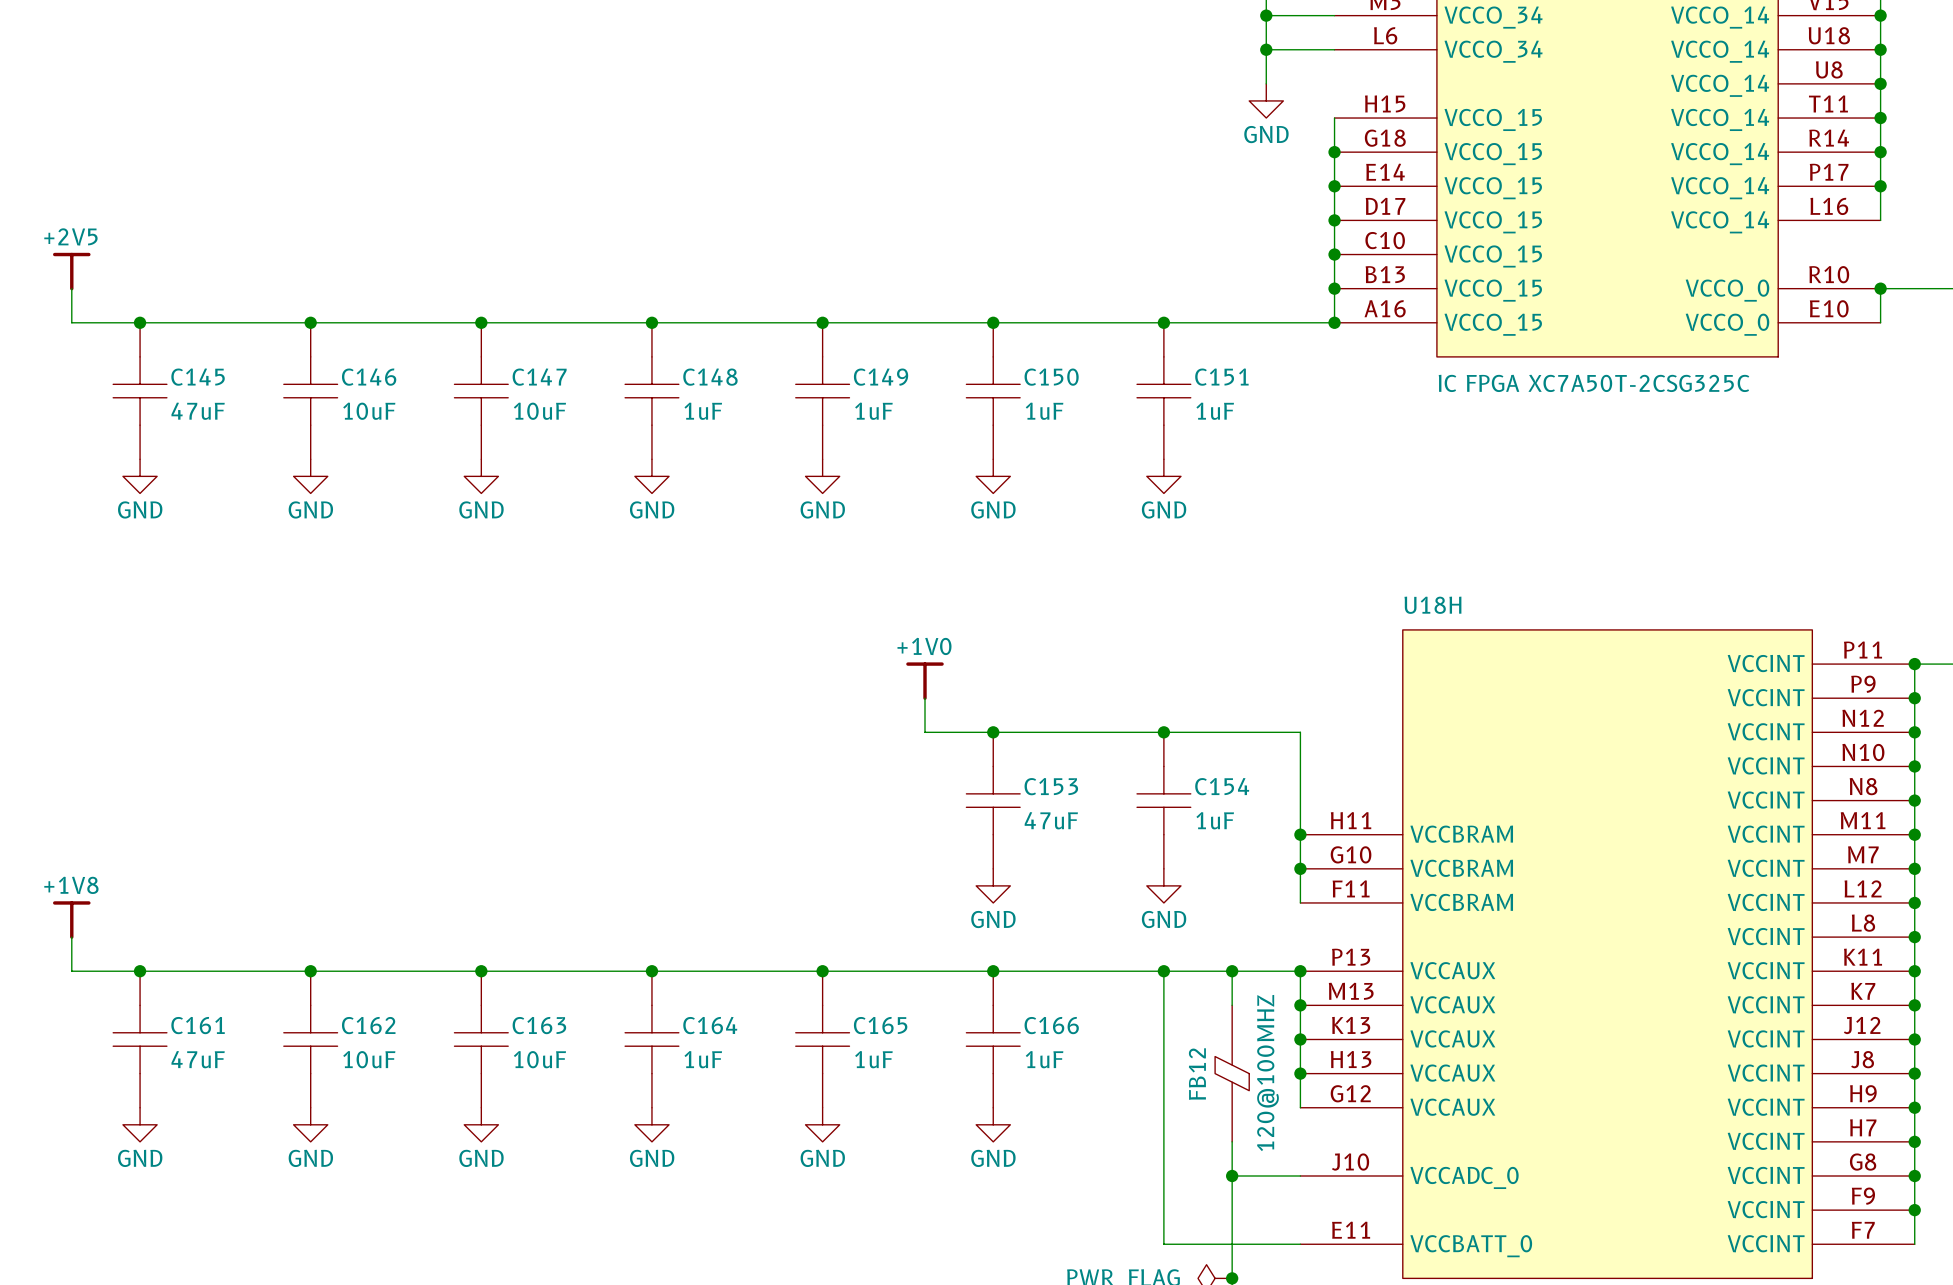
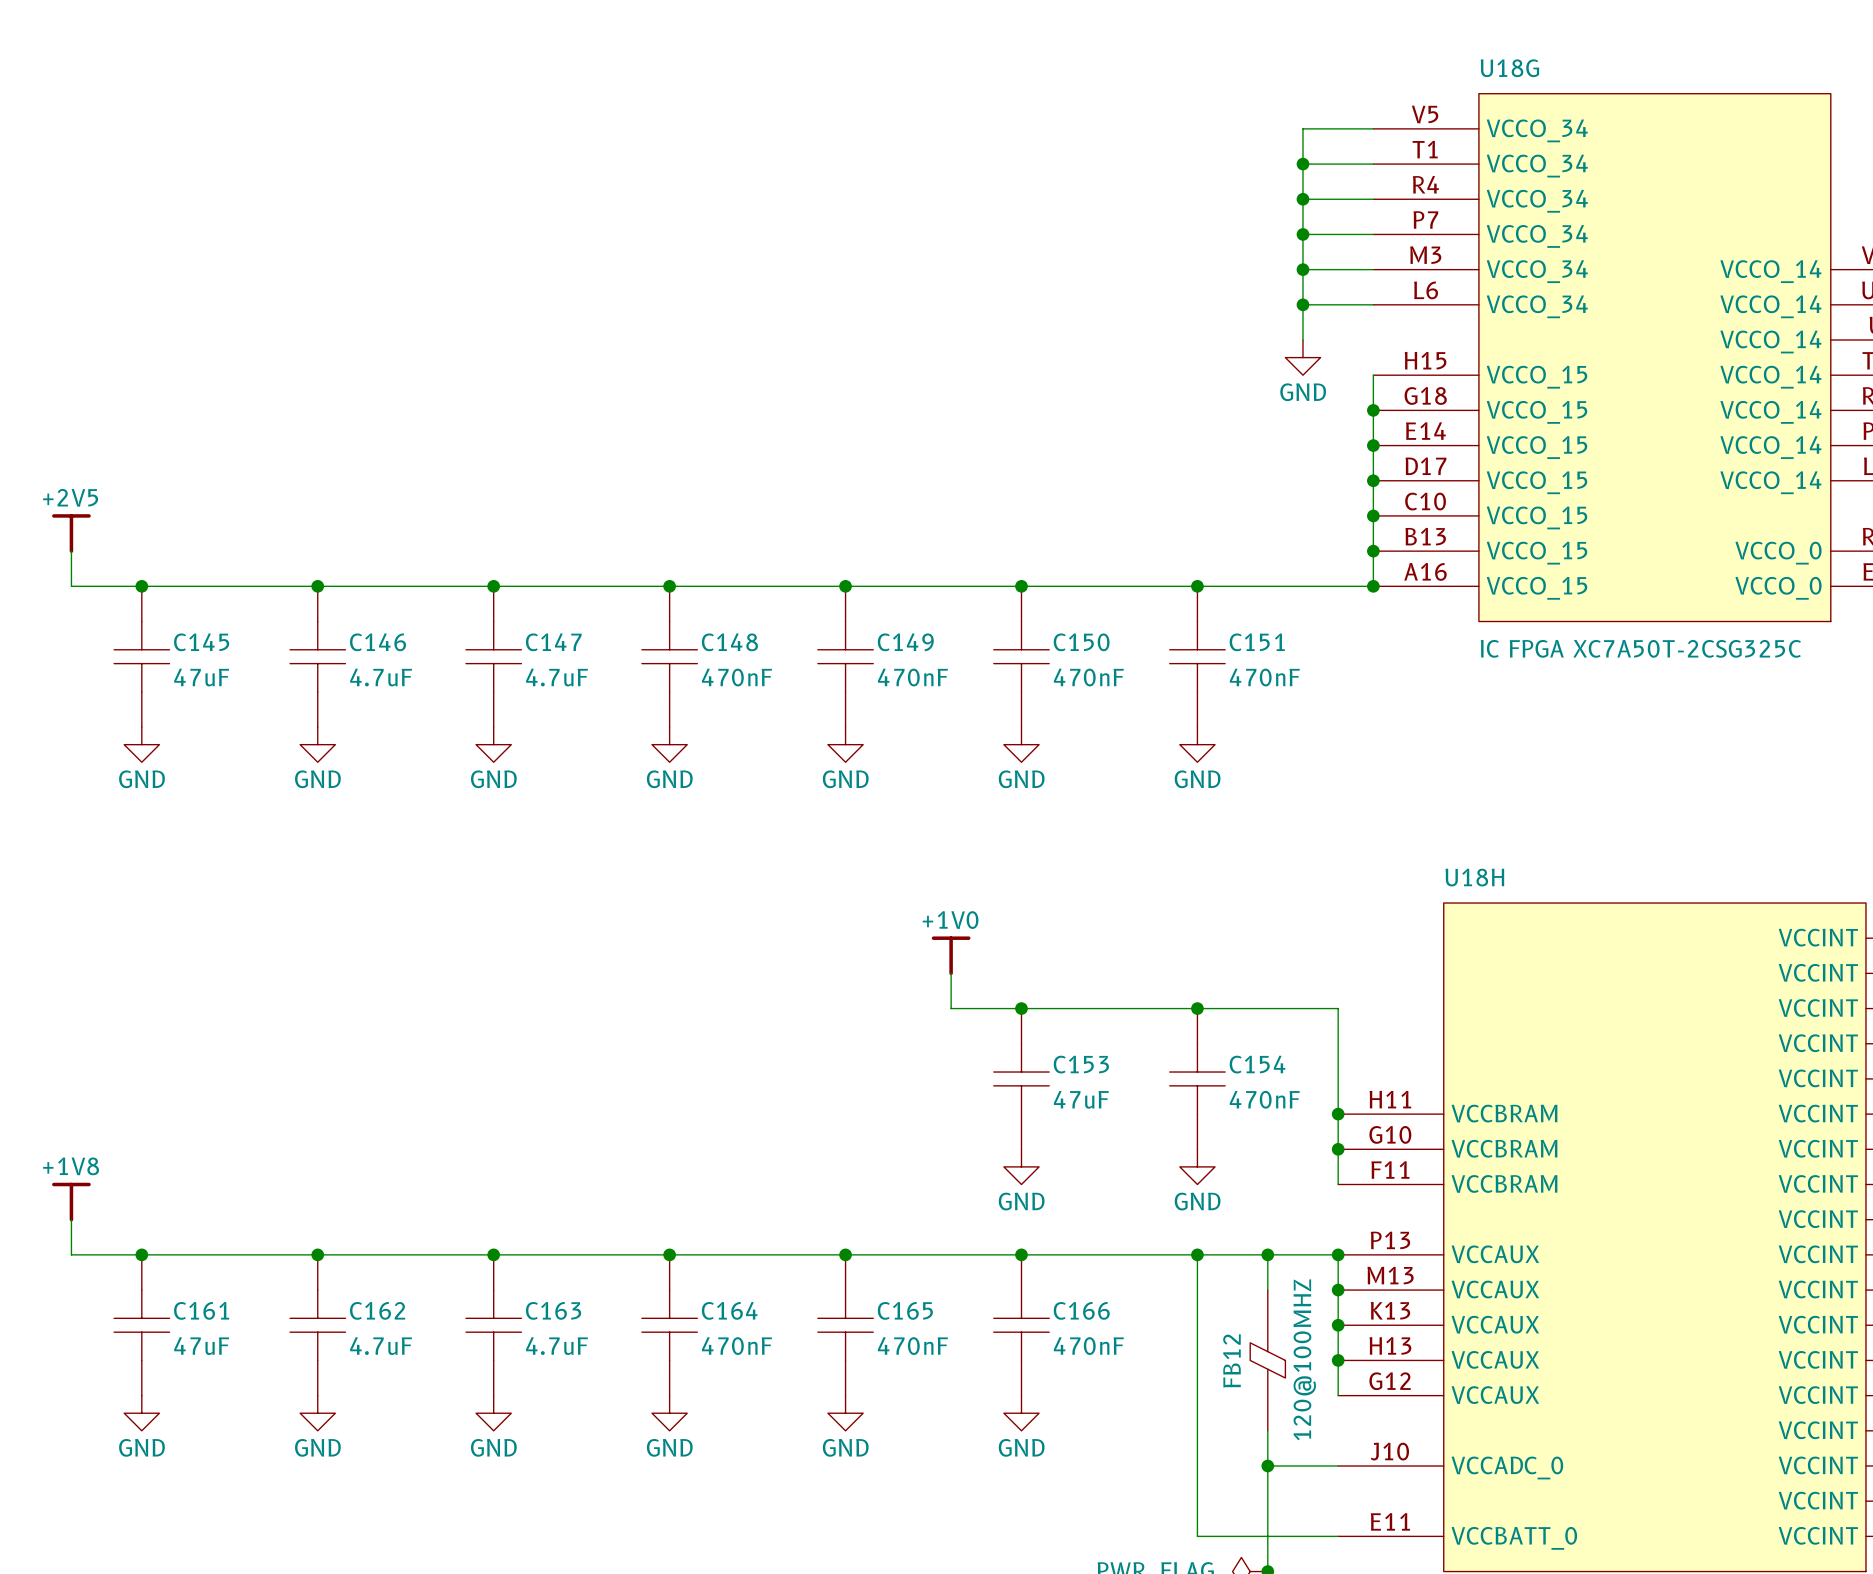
C146 value: 10uF (369, 411) -> 4.7uF (381, 677)
C147 value: 10uF (539, 411) -> 4.7uF (557, 677)
C148 value: 1uF (703, 411) -> 470nF (736, 677)
C149 value: 1uF (873, 411) -> 470nF (912, 677)
C150 value: 1uF (1044, 411) -> 470nF (1088, 677)
C151 value: 1uF (1215, 411) -> 470nF (1264, 677)
C154 value: 1uF (1215, 820) -> 470nF (1264, 1099)
C162 value: 10uF (369, 1059) -> 4.7uF (381, 1346)
C163 value: 10uF (539, 1059) -> 4.7uF (557, 1346)
C164 value: 1uF (703, 1059) -> 470nF (736, 1346)
C165 value: 1uF (873, 1059) -> 470nF (912, 1346)
C166 value: 1uF (1044, 1059) -> 470nF (1088, 1346)

